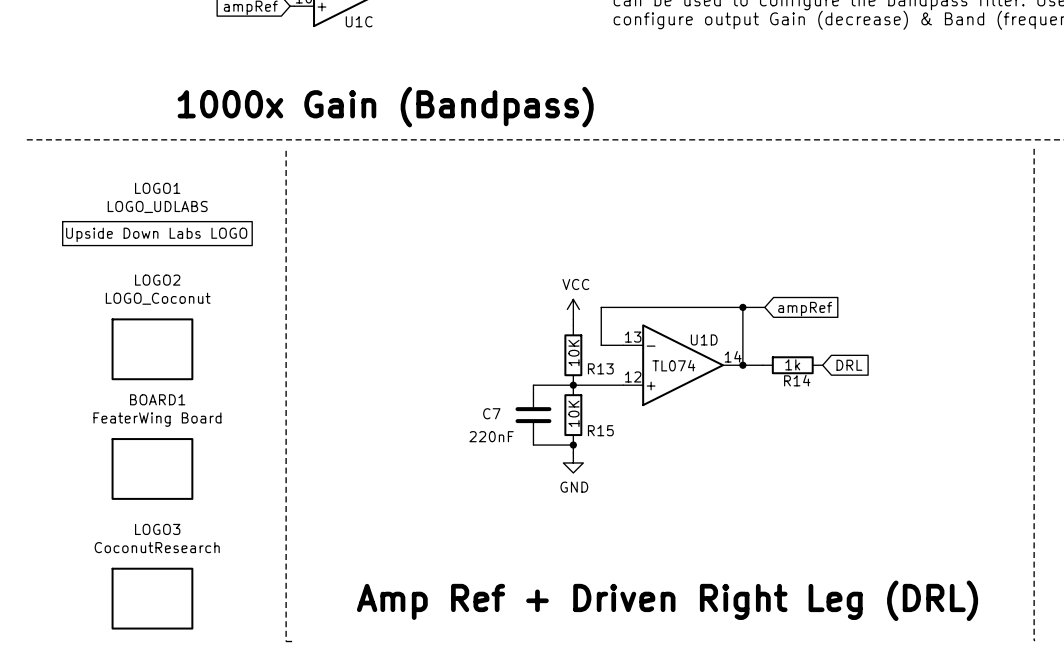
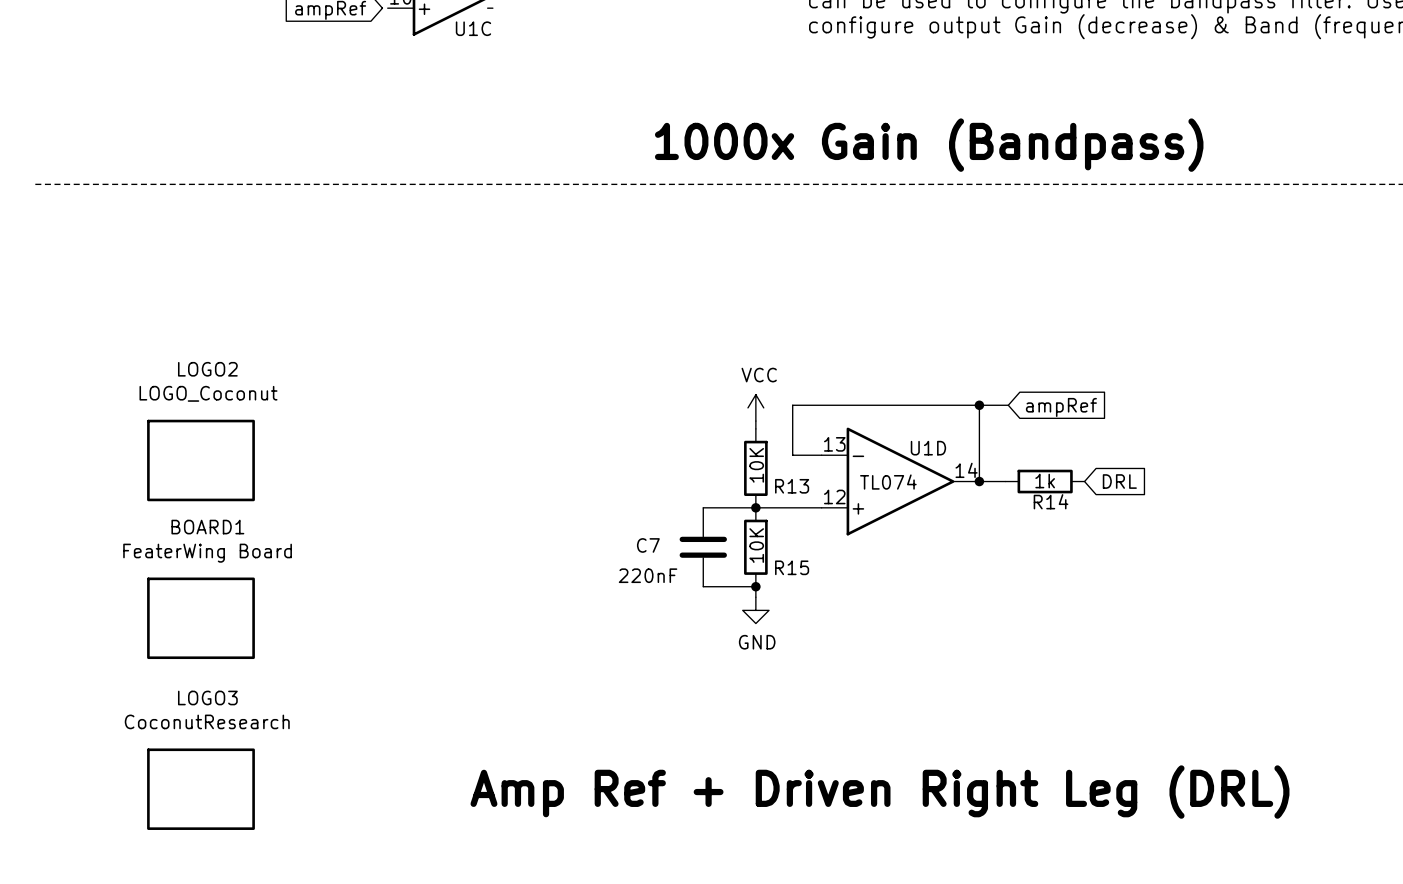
wire: (290, 6) (294, 6) -> (487, 8) (492, 8)
text: 1000x Gain (Bandpass) (385, 107) -> none
text: none -> 1000x Gain (Bandpass) (929, 145)
line: (1034, 148) (1035, 640) -> none
line: (286, 150) (286, 641) (292, 641) -> none
LOGO1: LOGO_UDLABS (157, 233) -> none

